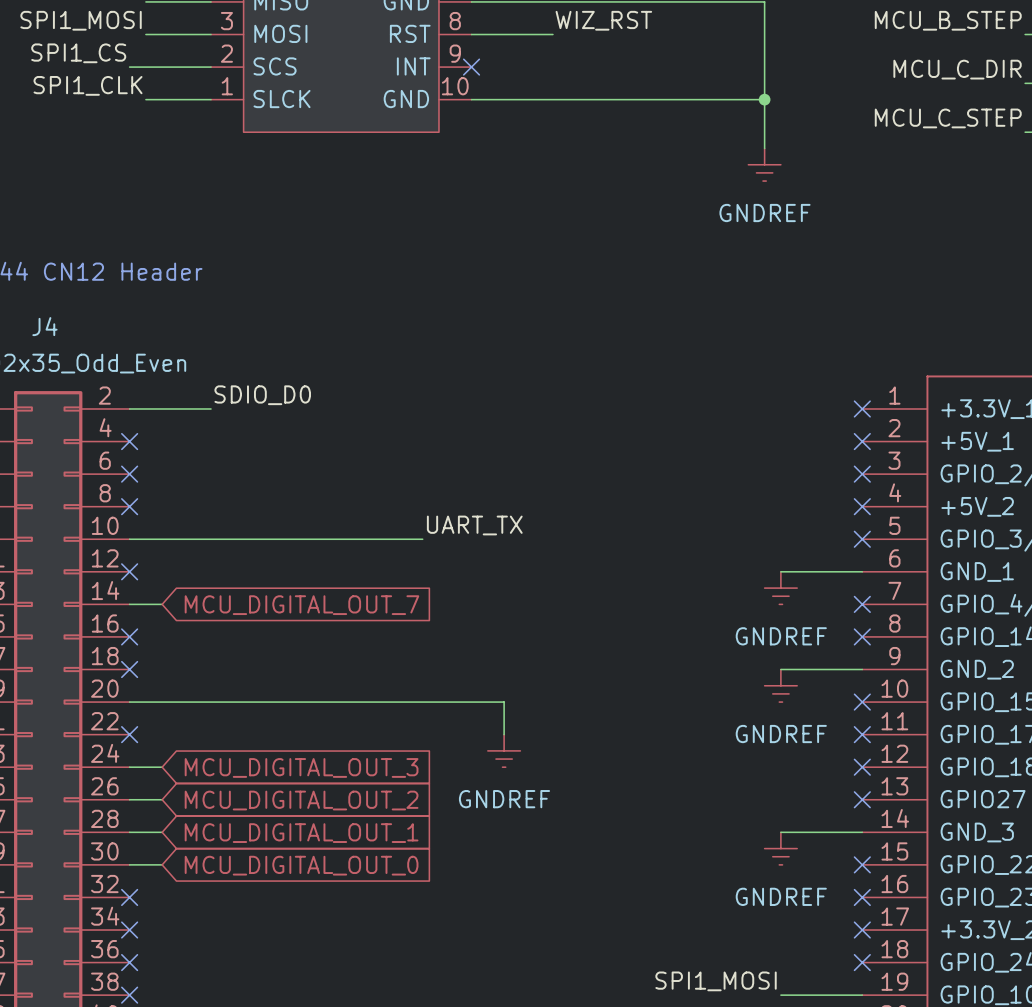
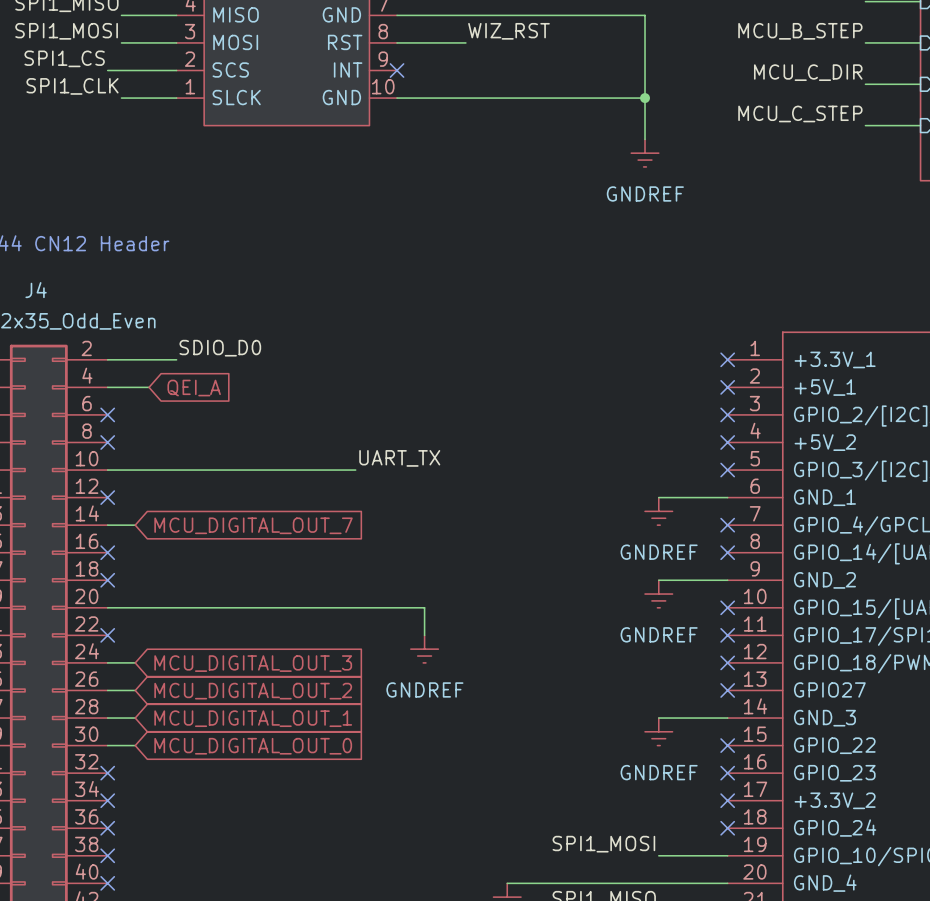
wire: none -> (107, 387) (149, 387)
no-connect mark: (129, 441) -> none
global label: none -> QEI_A (194, 388)

